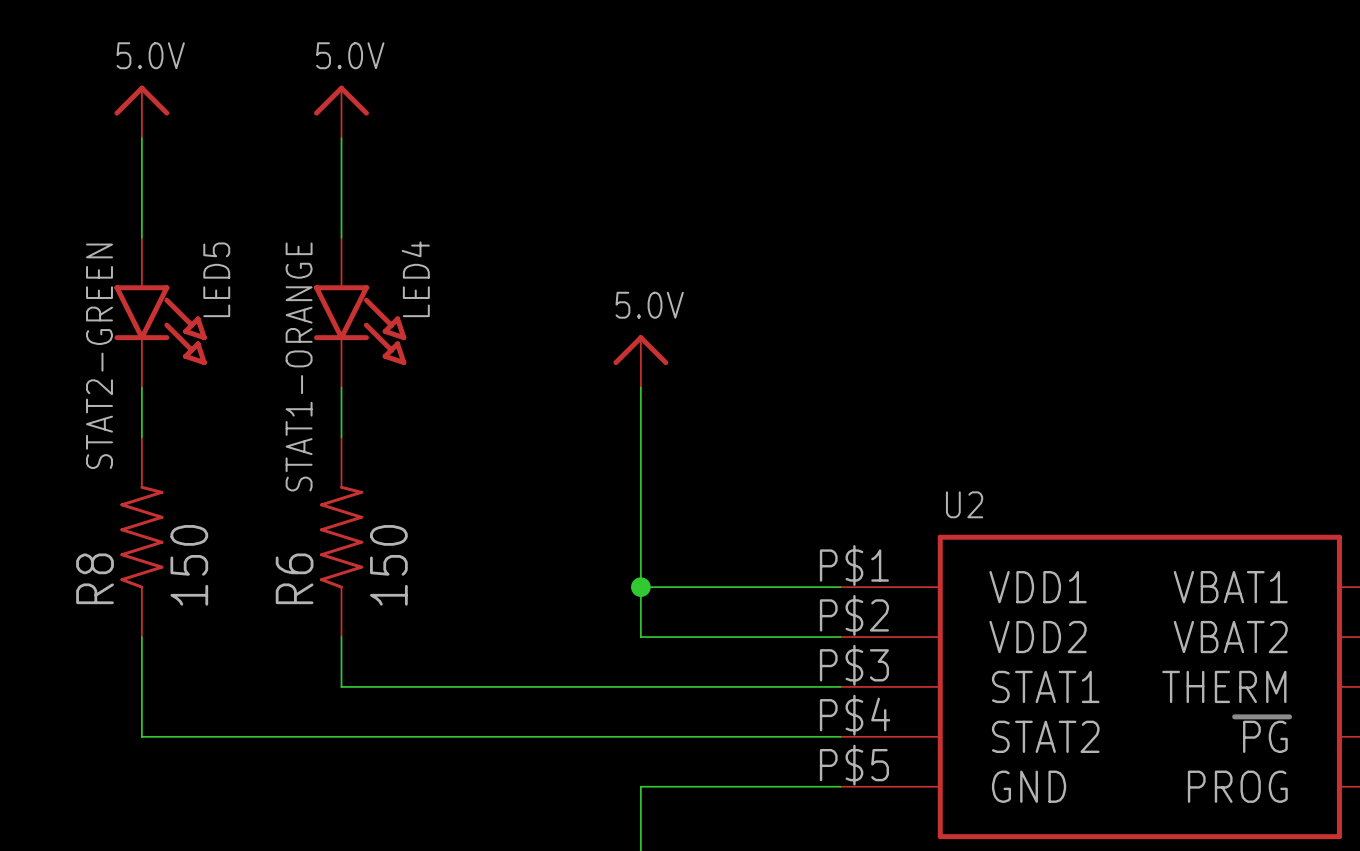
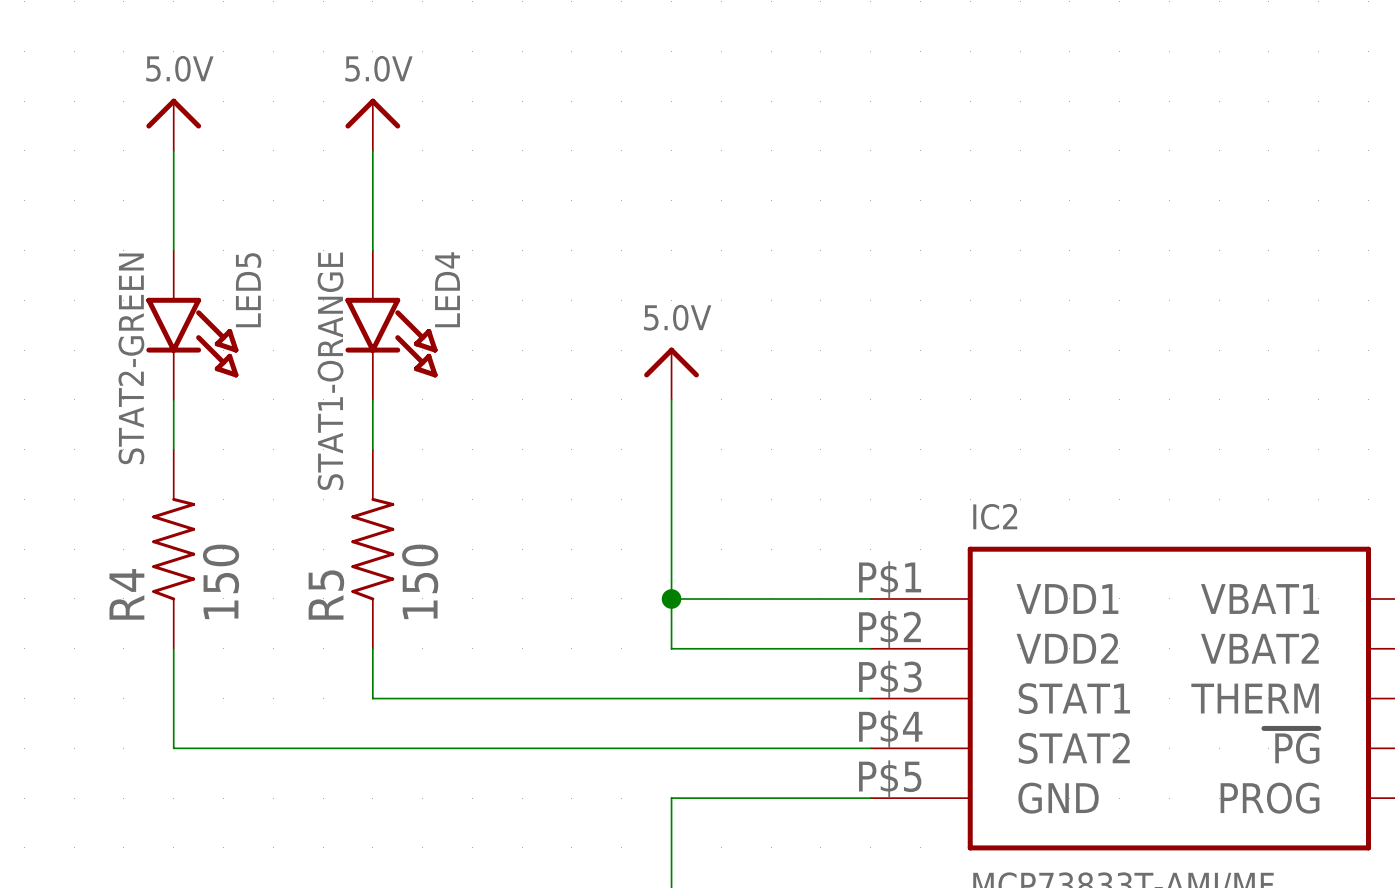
U2 name: U2 (964, 504) -> IC2 (995, 516)
R8 name: R8 (95, 578) -> R4 (126, 594)
R6 name: R6 (294, 578) -> R5 (326, 595)

